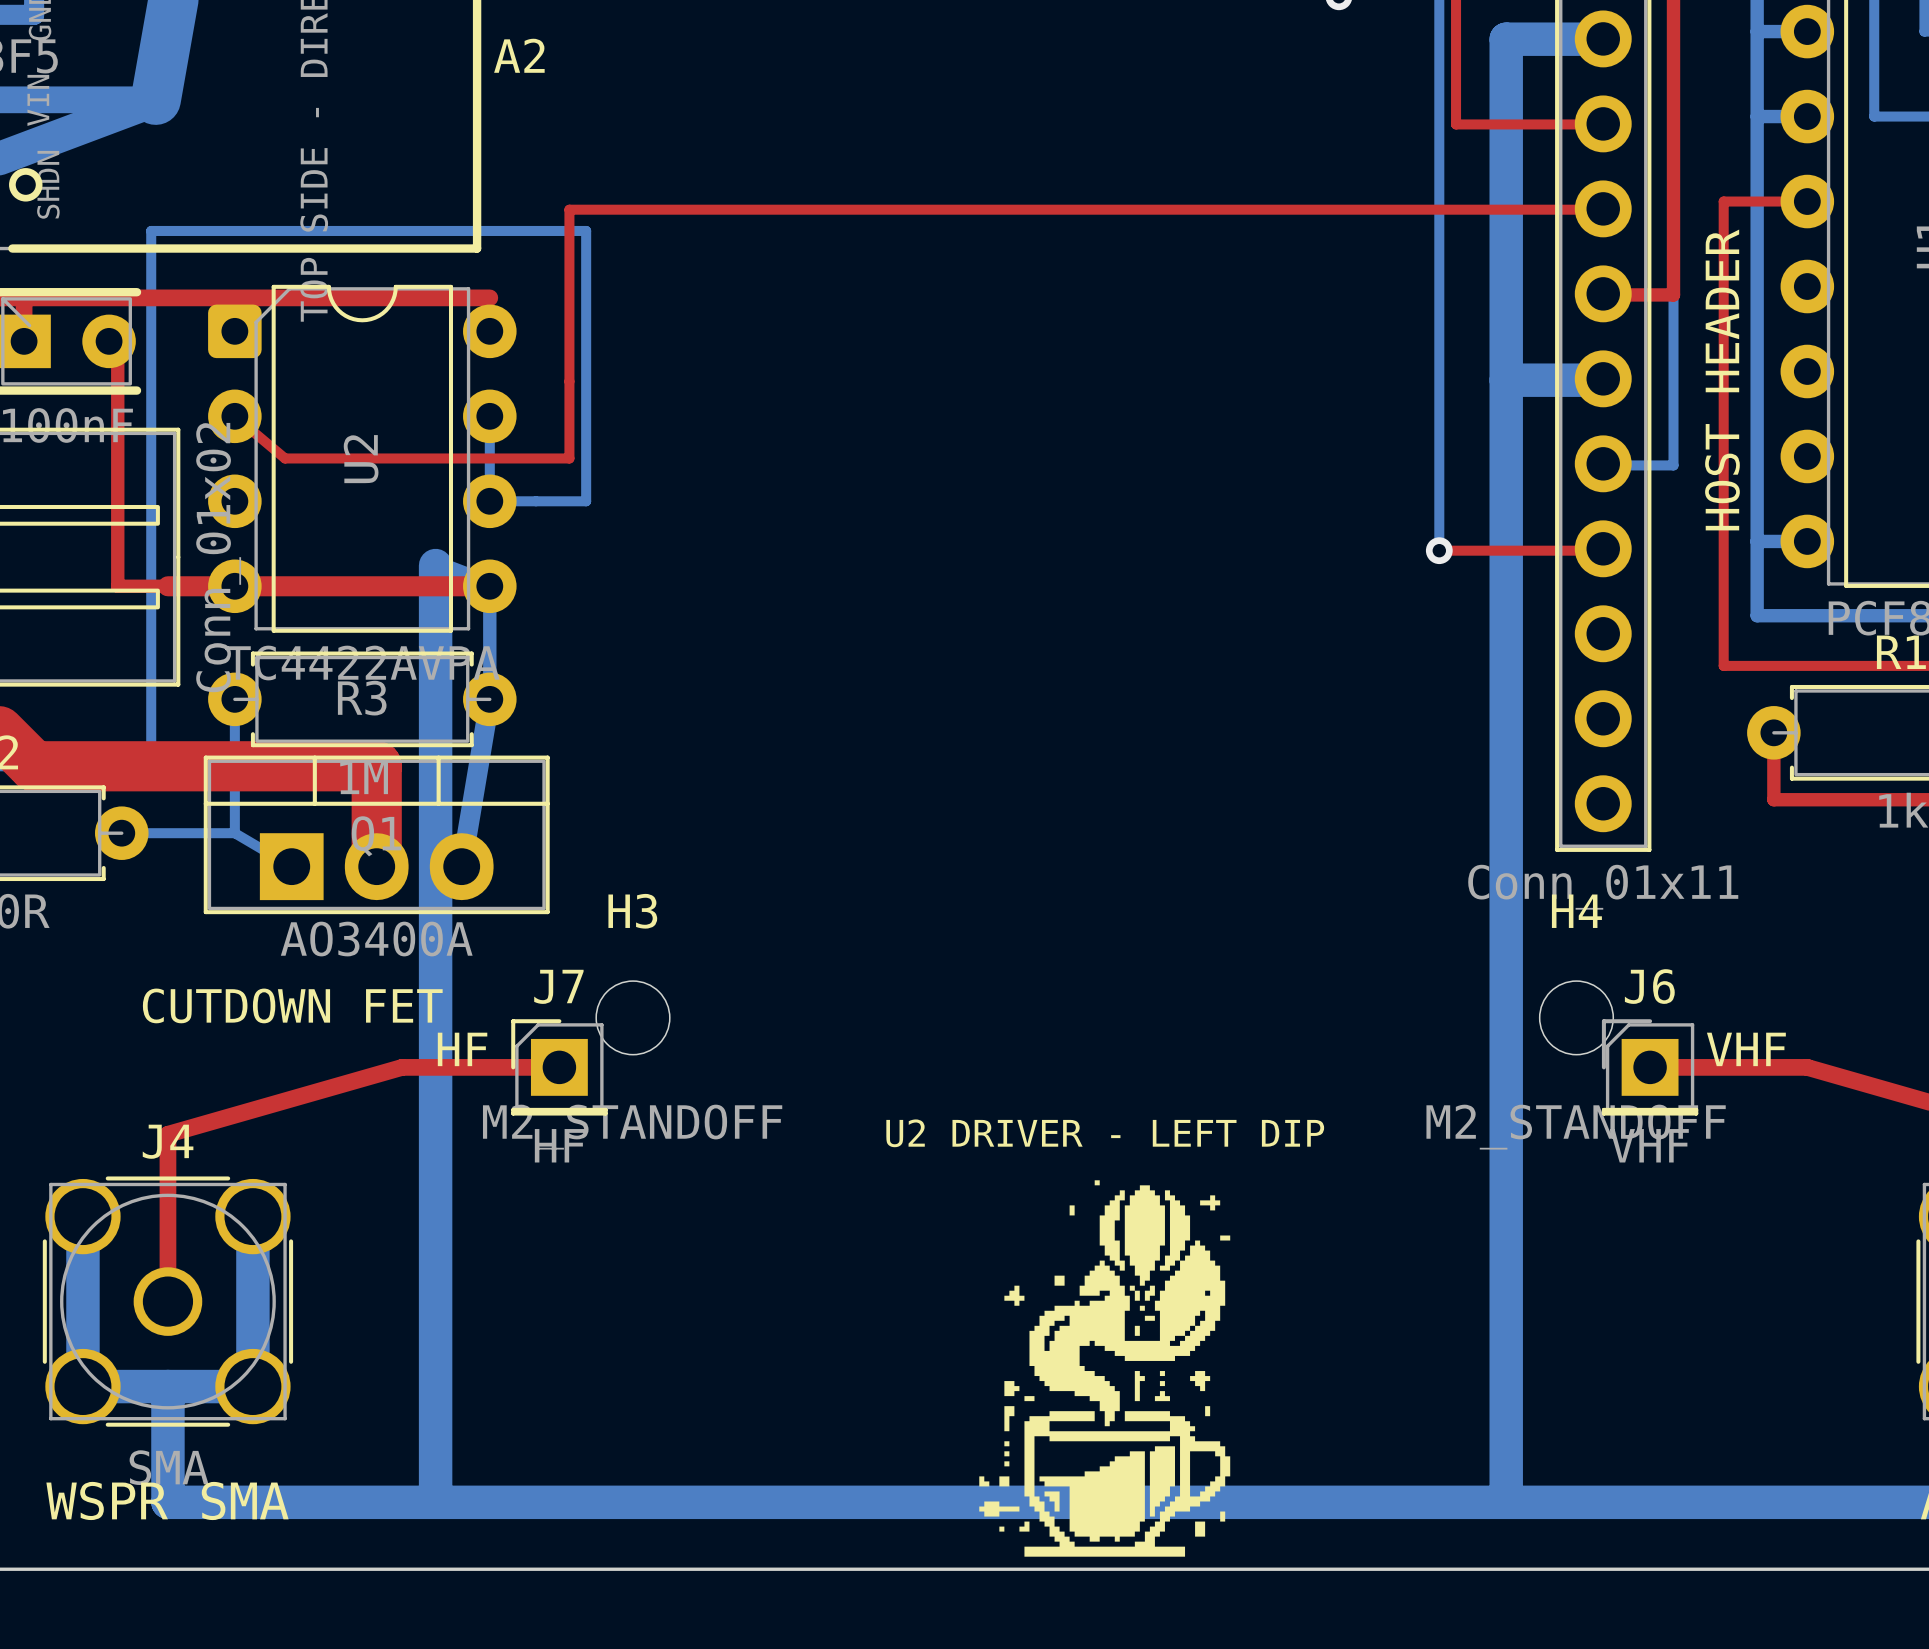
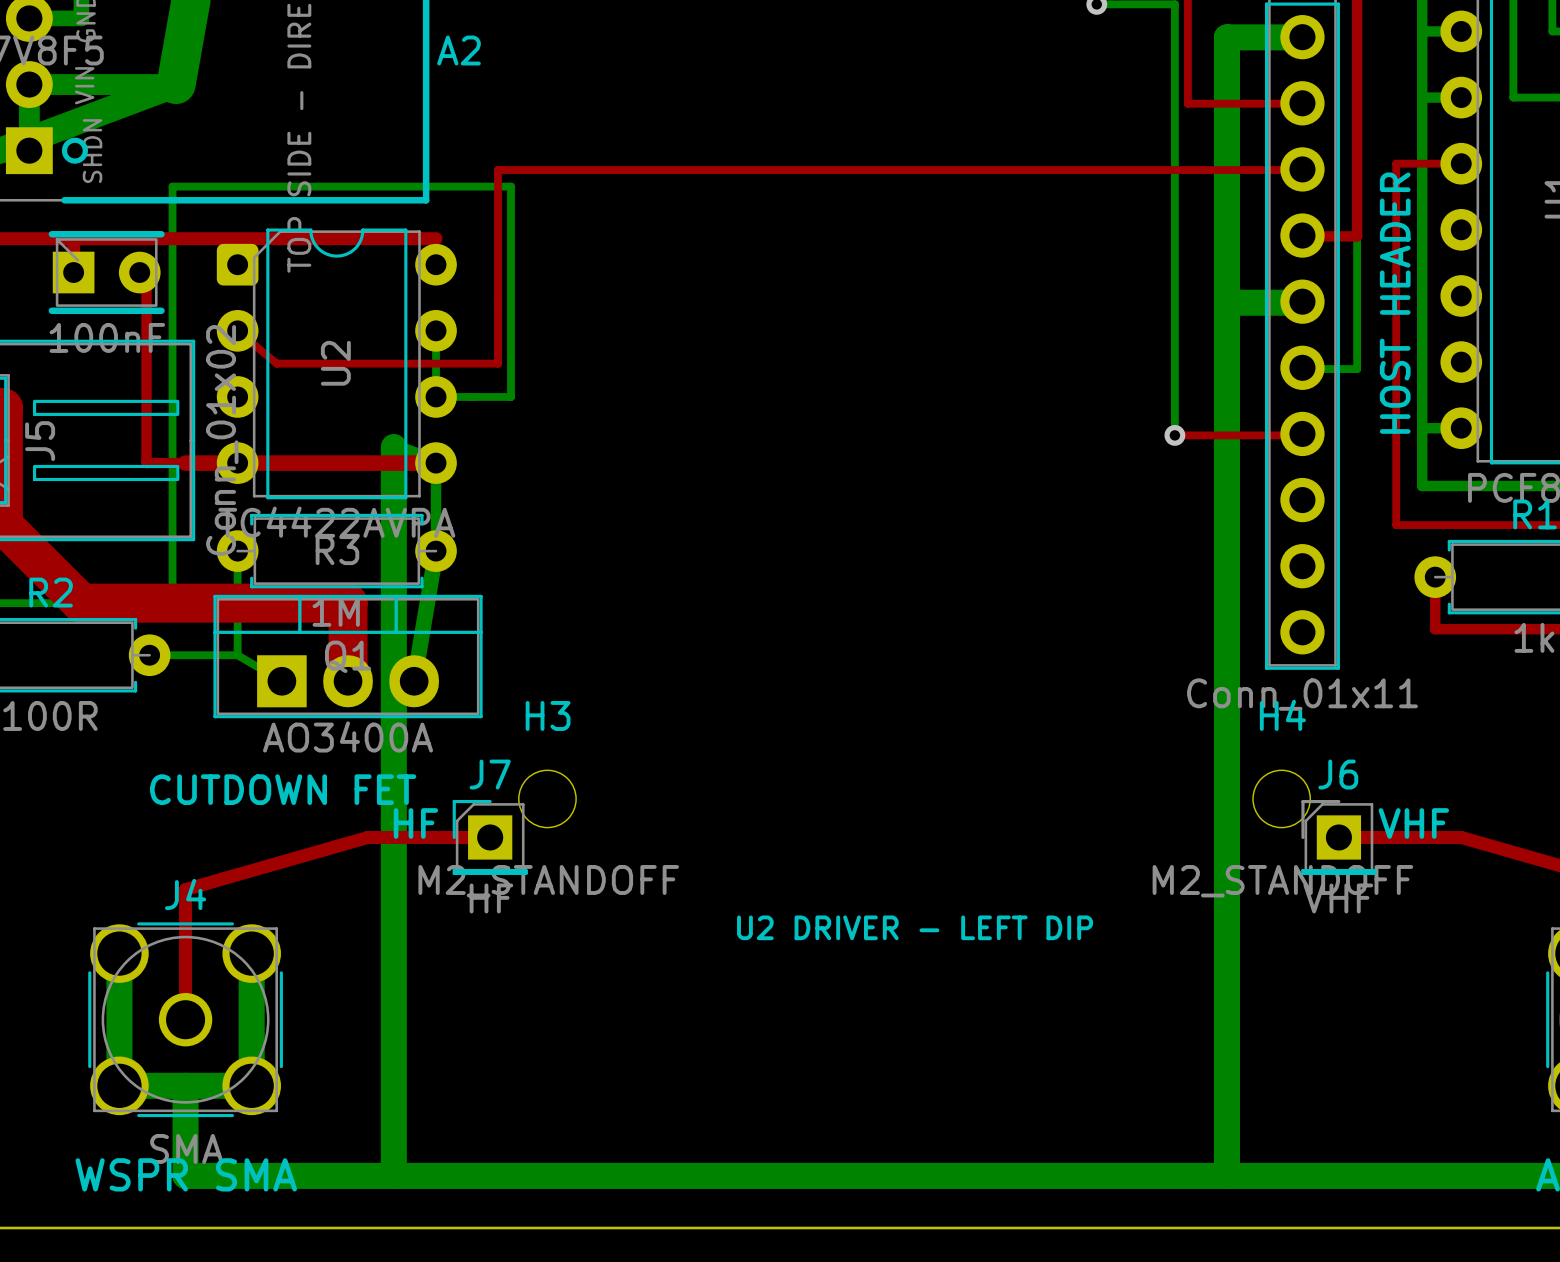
text position: U2 DRIVER - LEFT DIP (1105, 1133) -> U2 DRIVER - LEFT DIP (915, 927)
drawing: [979, 1180, 1231, 1557] -> none

